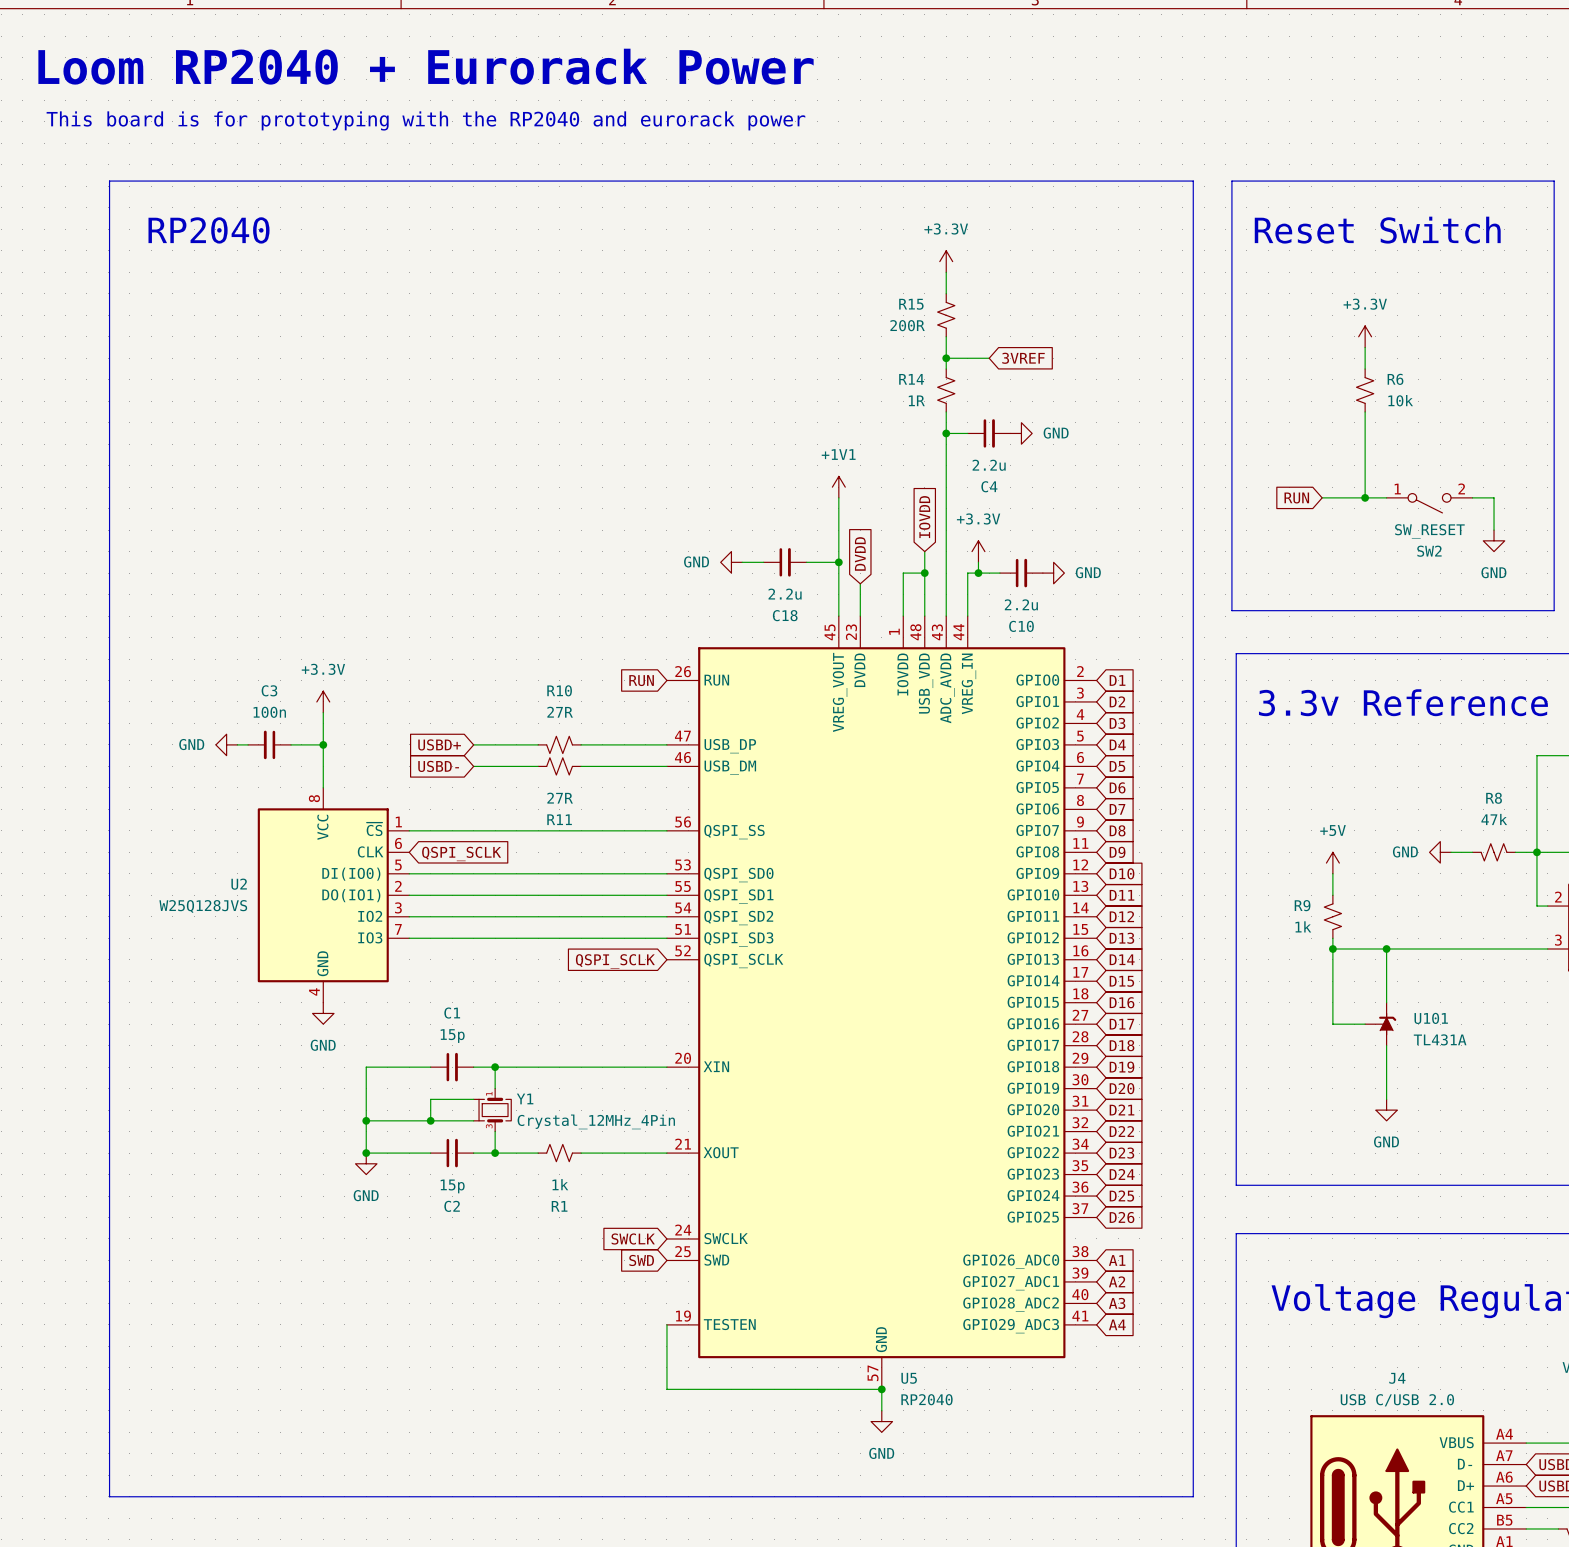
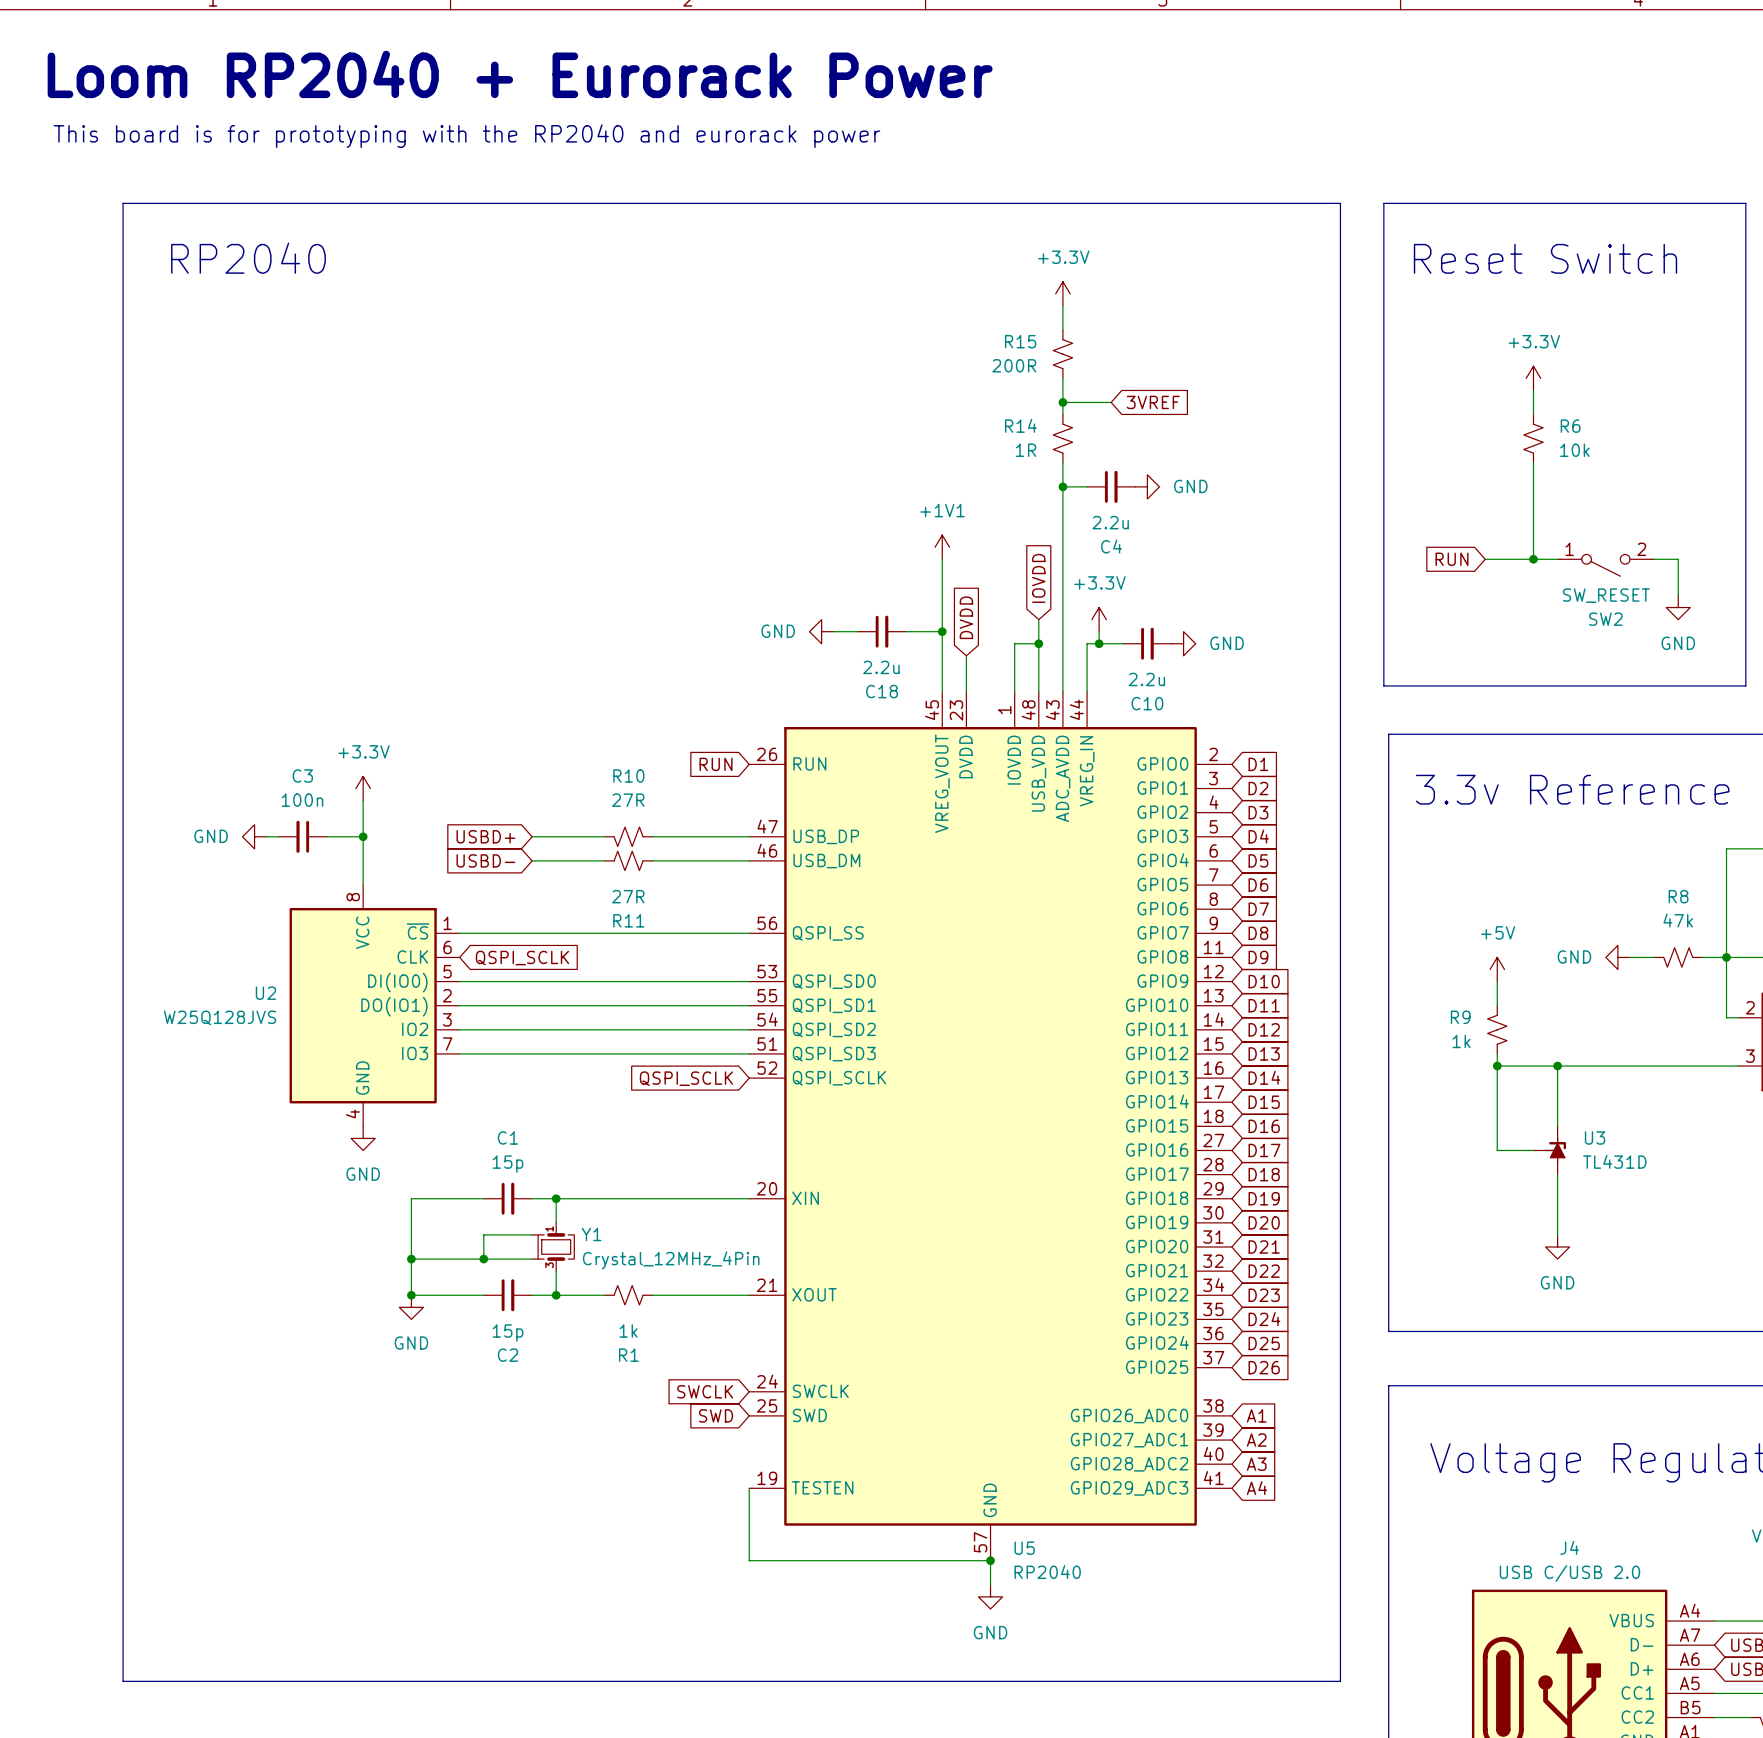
U3: none -> TL431D (1549, 1150)
U101: TL431A (1380, 1024) -> none

